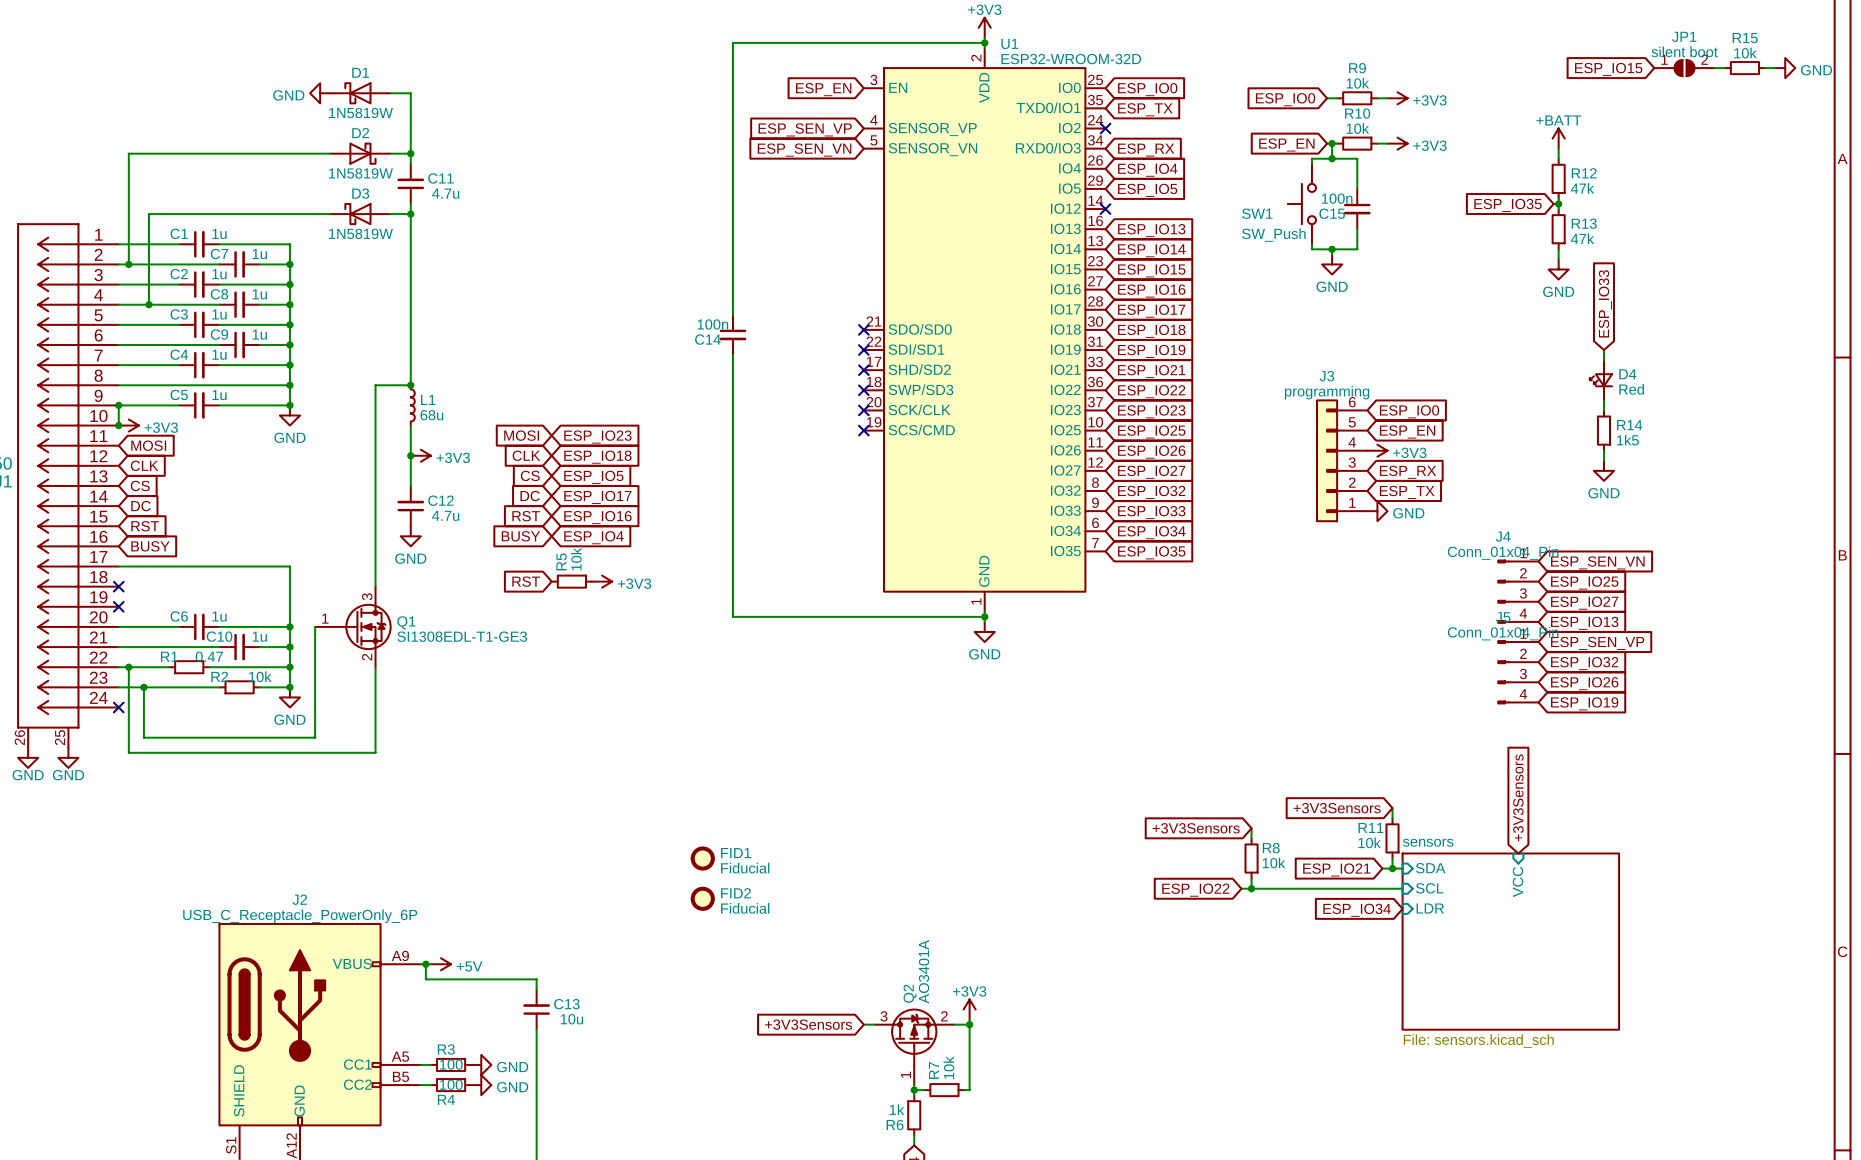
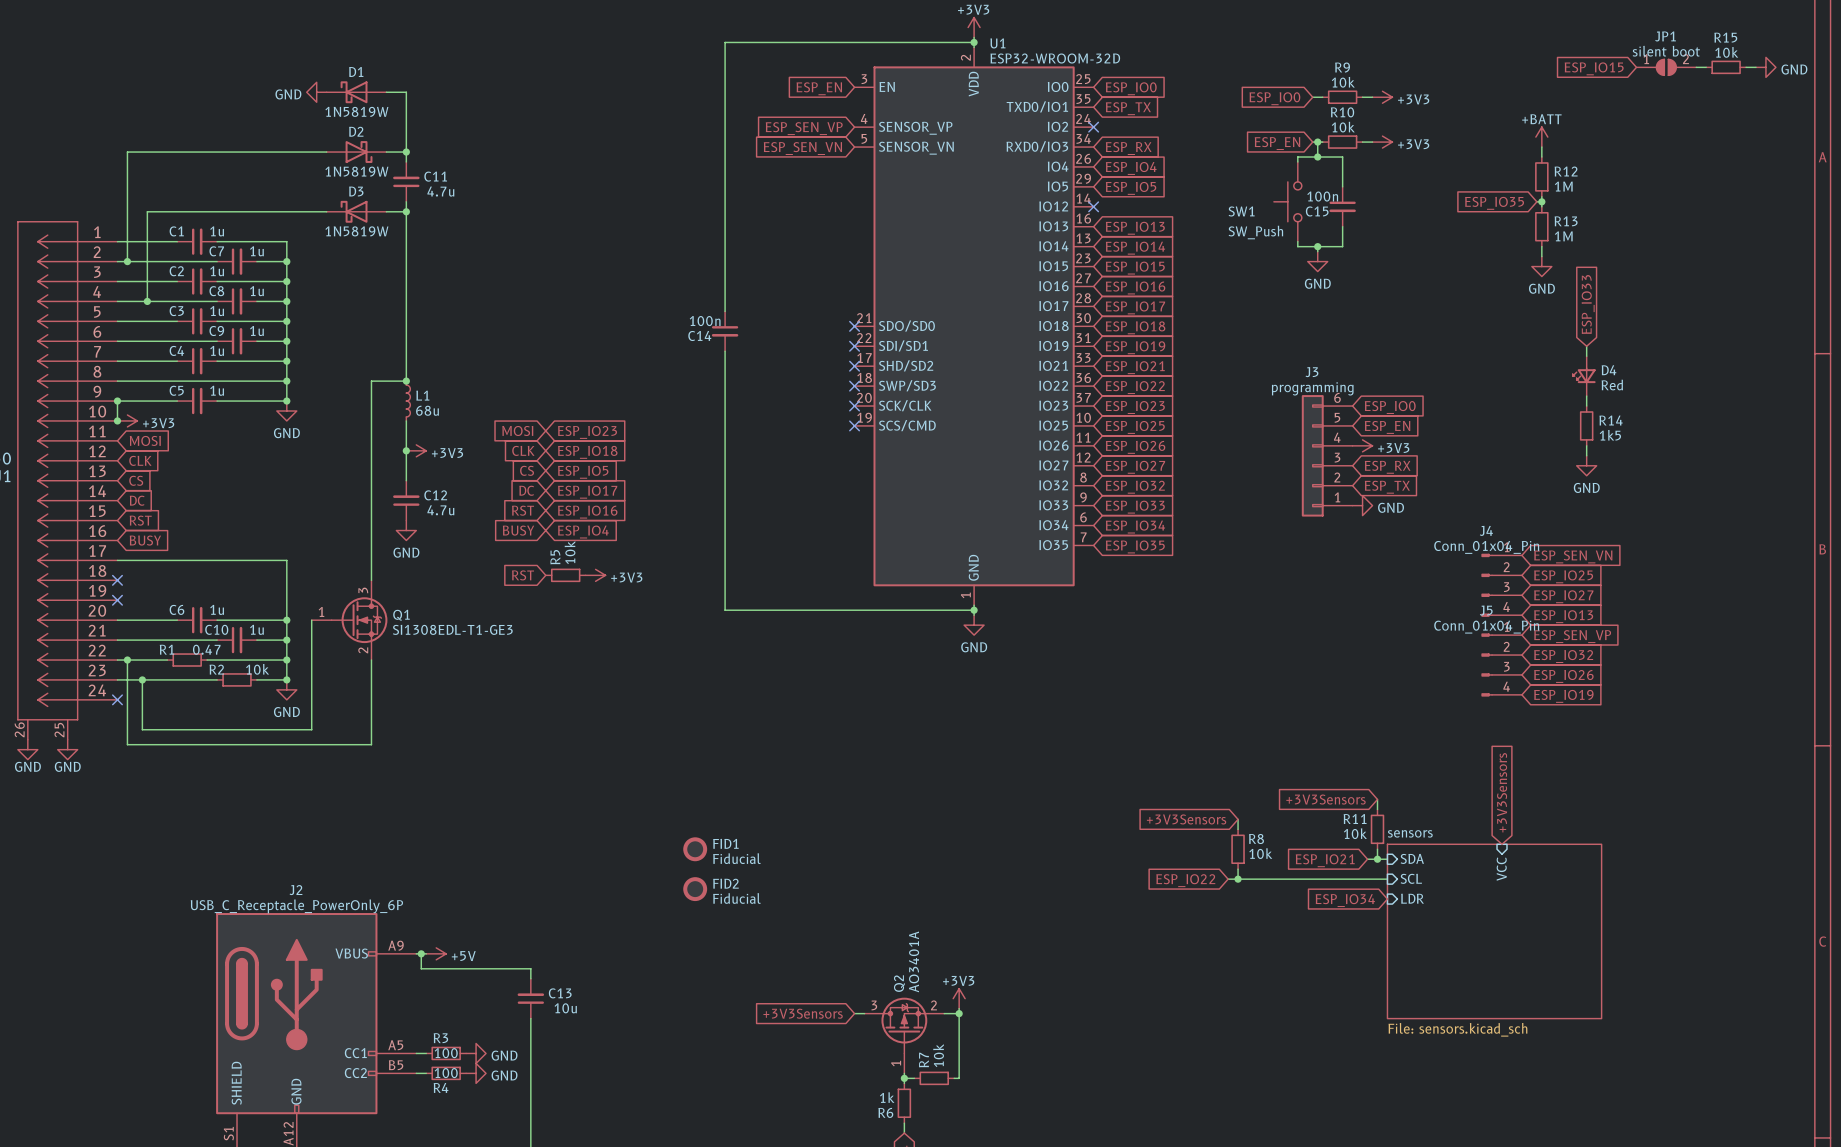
R12 value: 47k (1582, 188) -> 1M (1563, 186)
R13 value: 47k (1582, 238) -> 1M (1563, 236)

